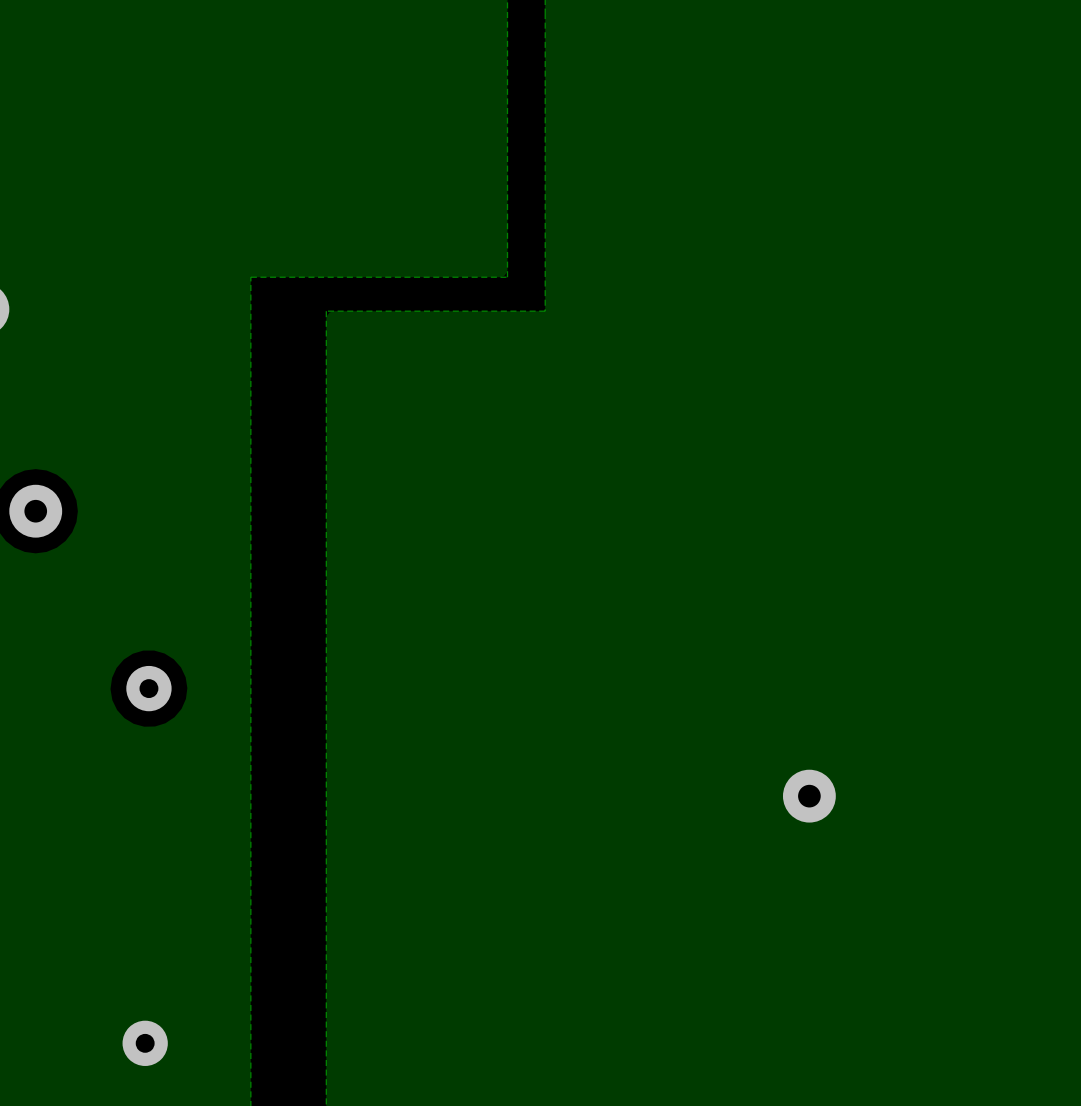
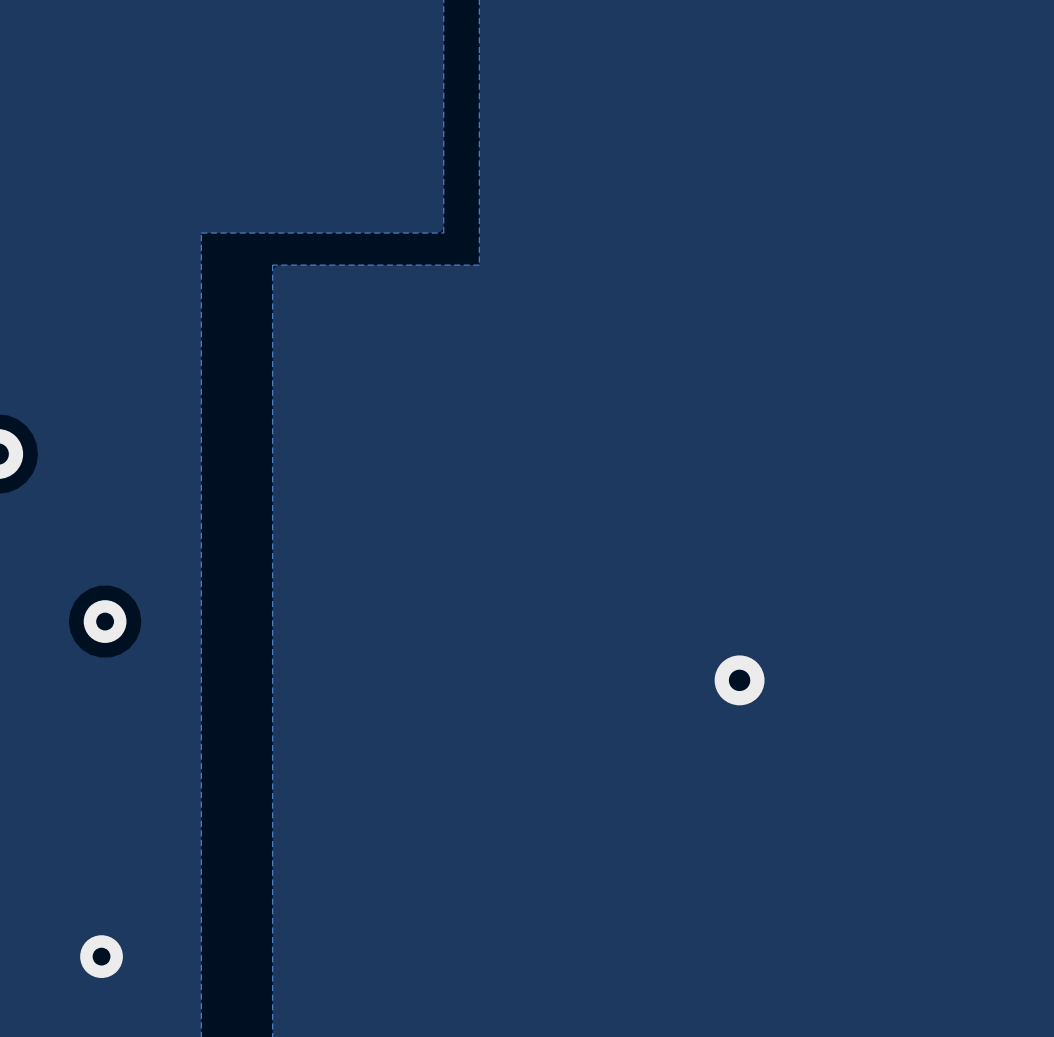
via position: (809, 796) -> (739, 680)

